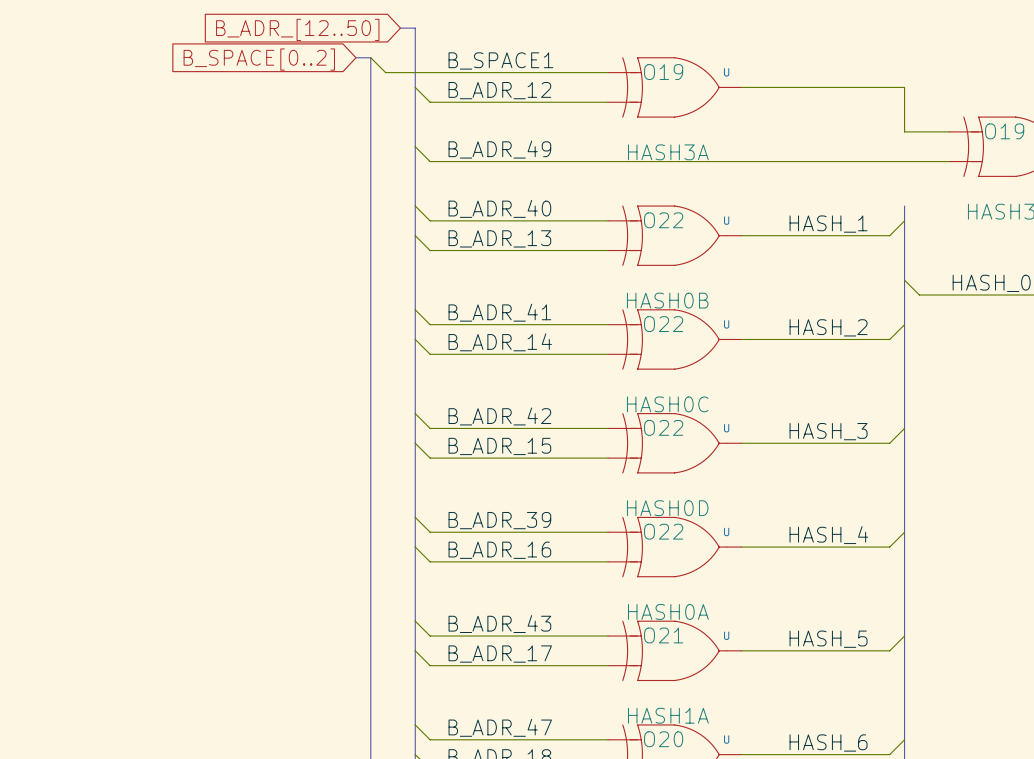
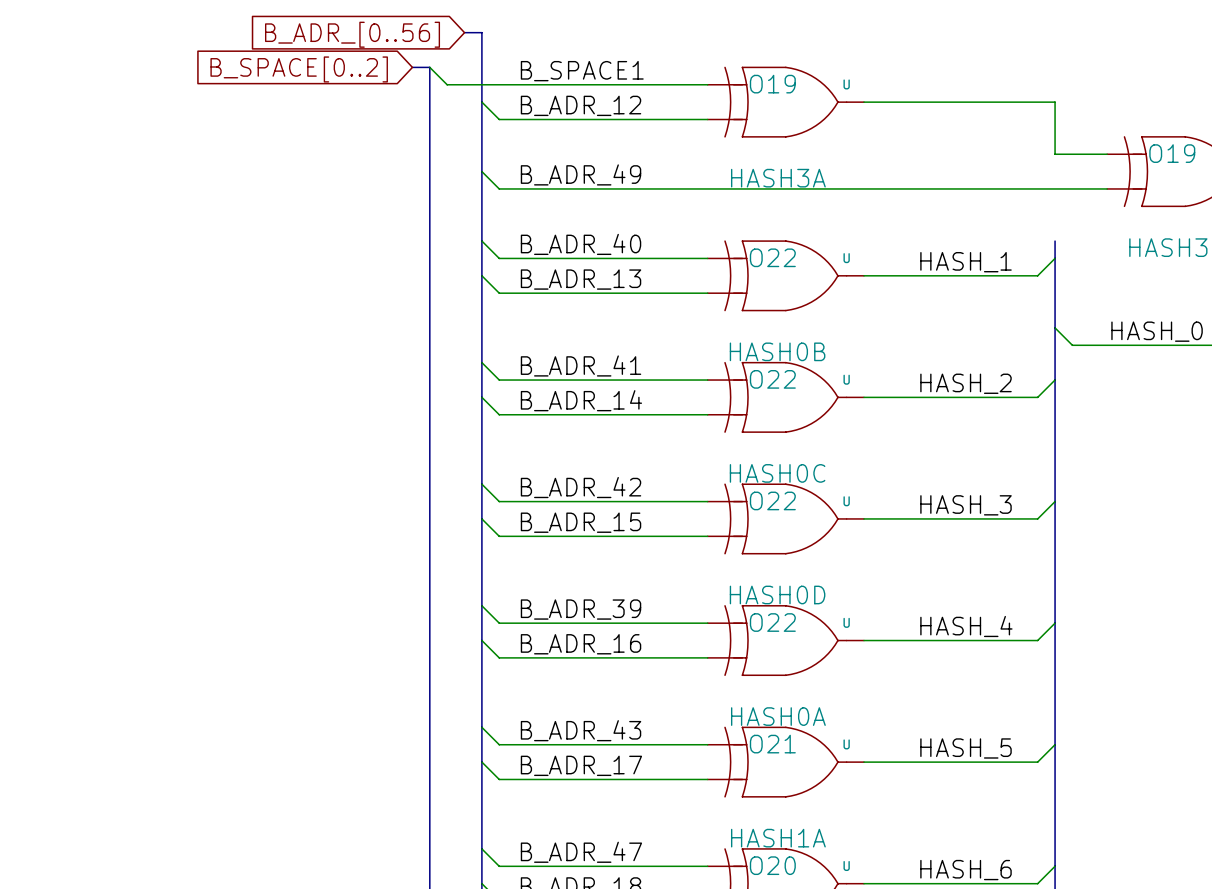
global label: B_ADR_[12..50] (297, 29) -> B_ADR_[0..56] (352, 34)

